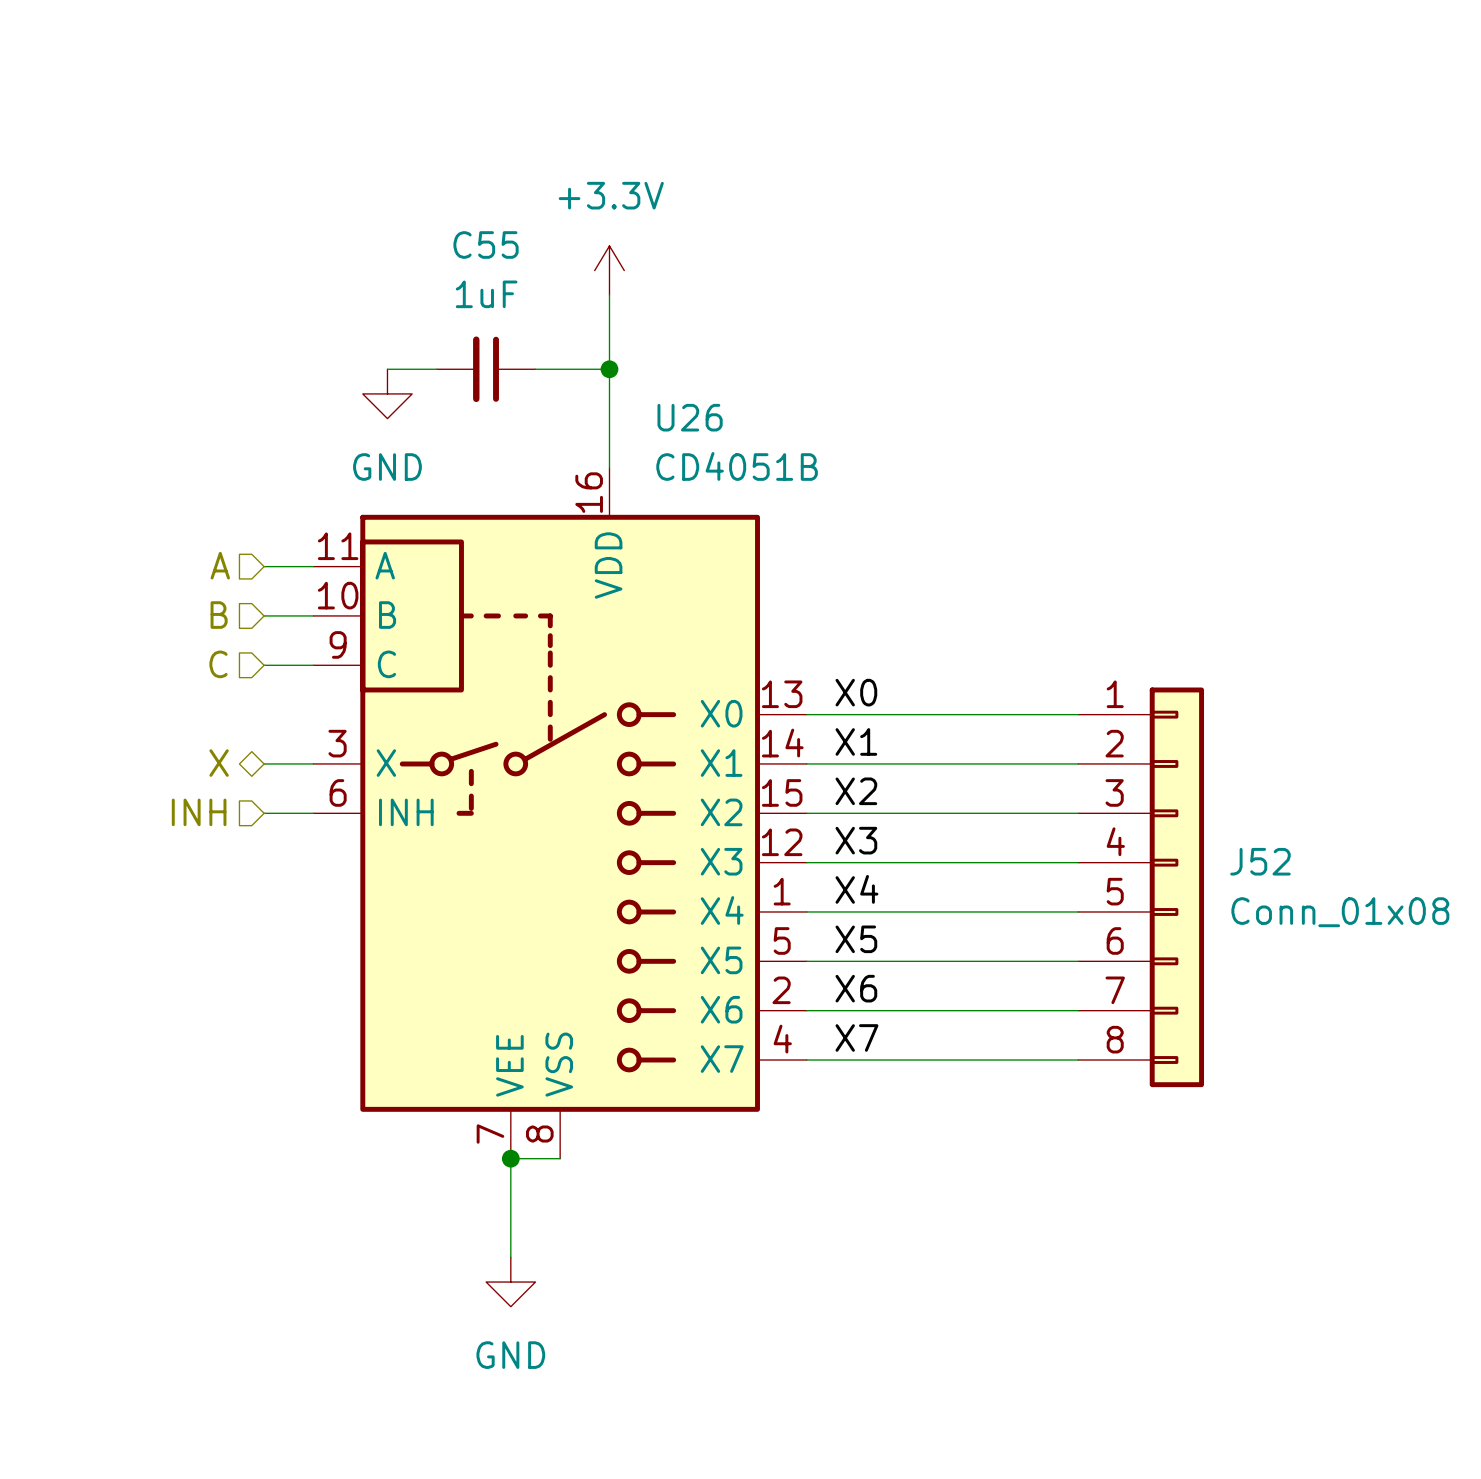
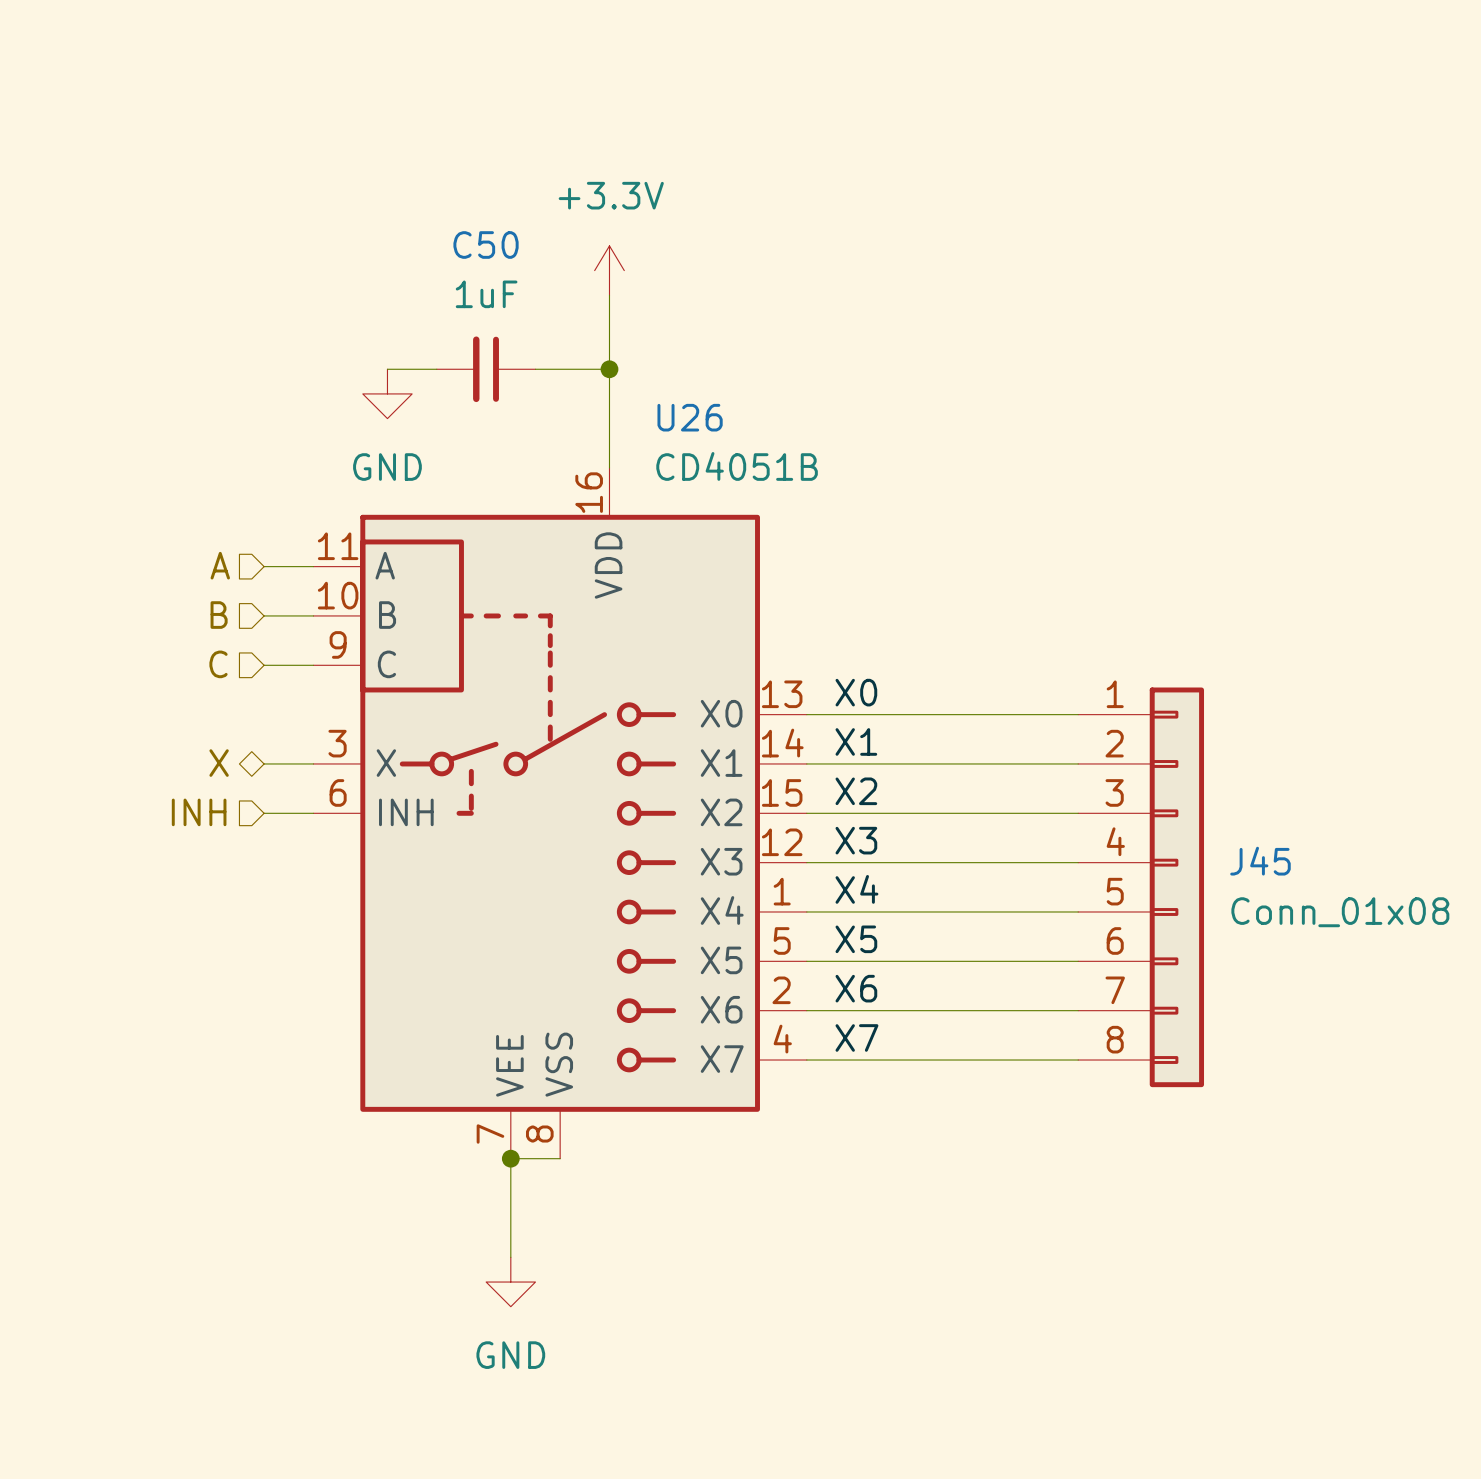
C55 name: C55 (486, 245) -> C50 (486, 245)
J52 name: J52 (1260, 861) -> J45 (1260, 861)

